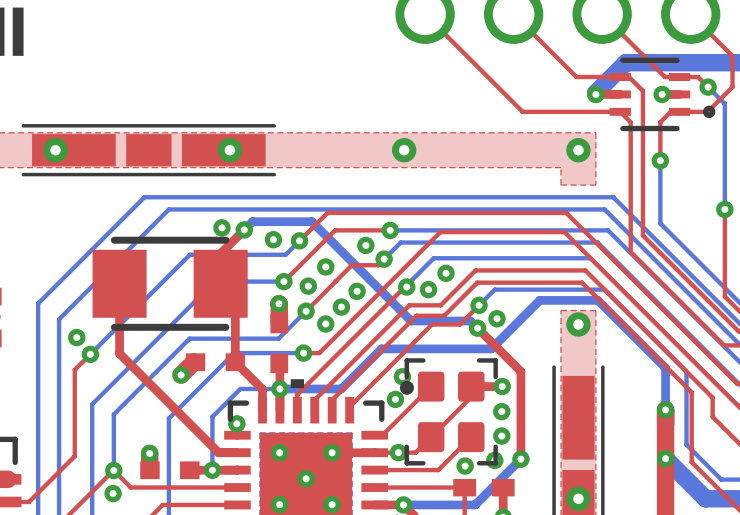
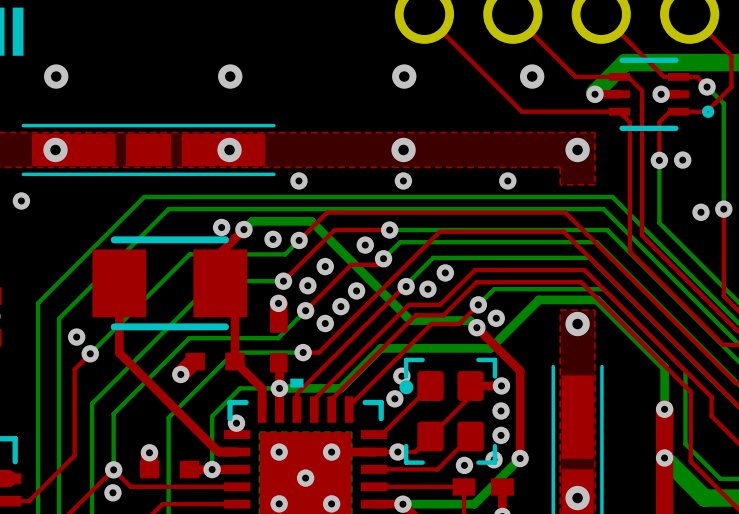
via: none -> (56, 76)
via: none -> (230, 76)
via: none -> (404, 76)
via: none -> (532, 76)
via: none -> (682, 160)
via: none -> (298, 180)
via: none -> (403, 180)
via: none -> (507, 180)
via: none -> (21, 200)
via: none -> (700, 212)

